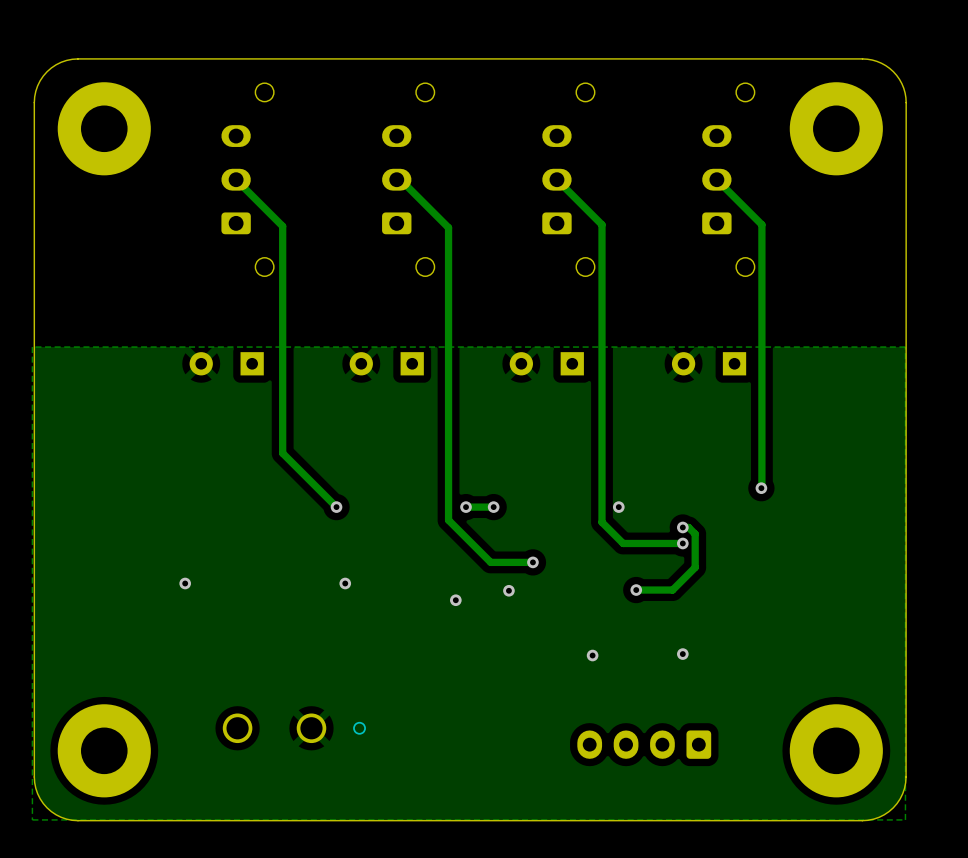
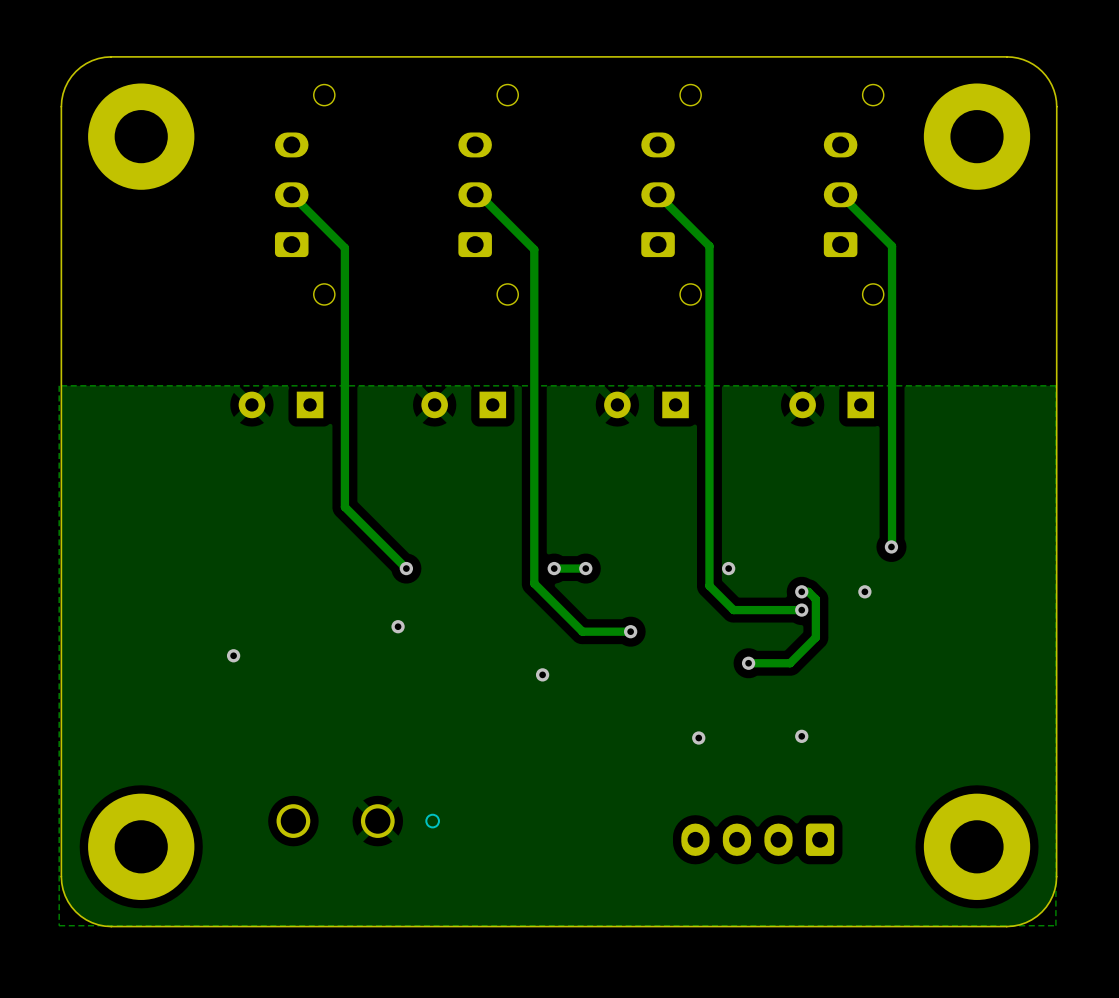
via: none -> (864, 591)
via position: (345, 583) -> (398, 626)
via: (508, 590) -> none

